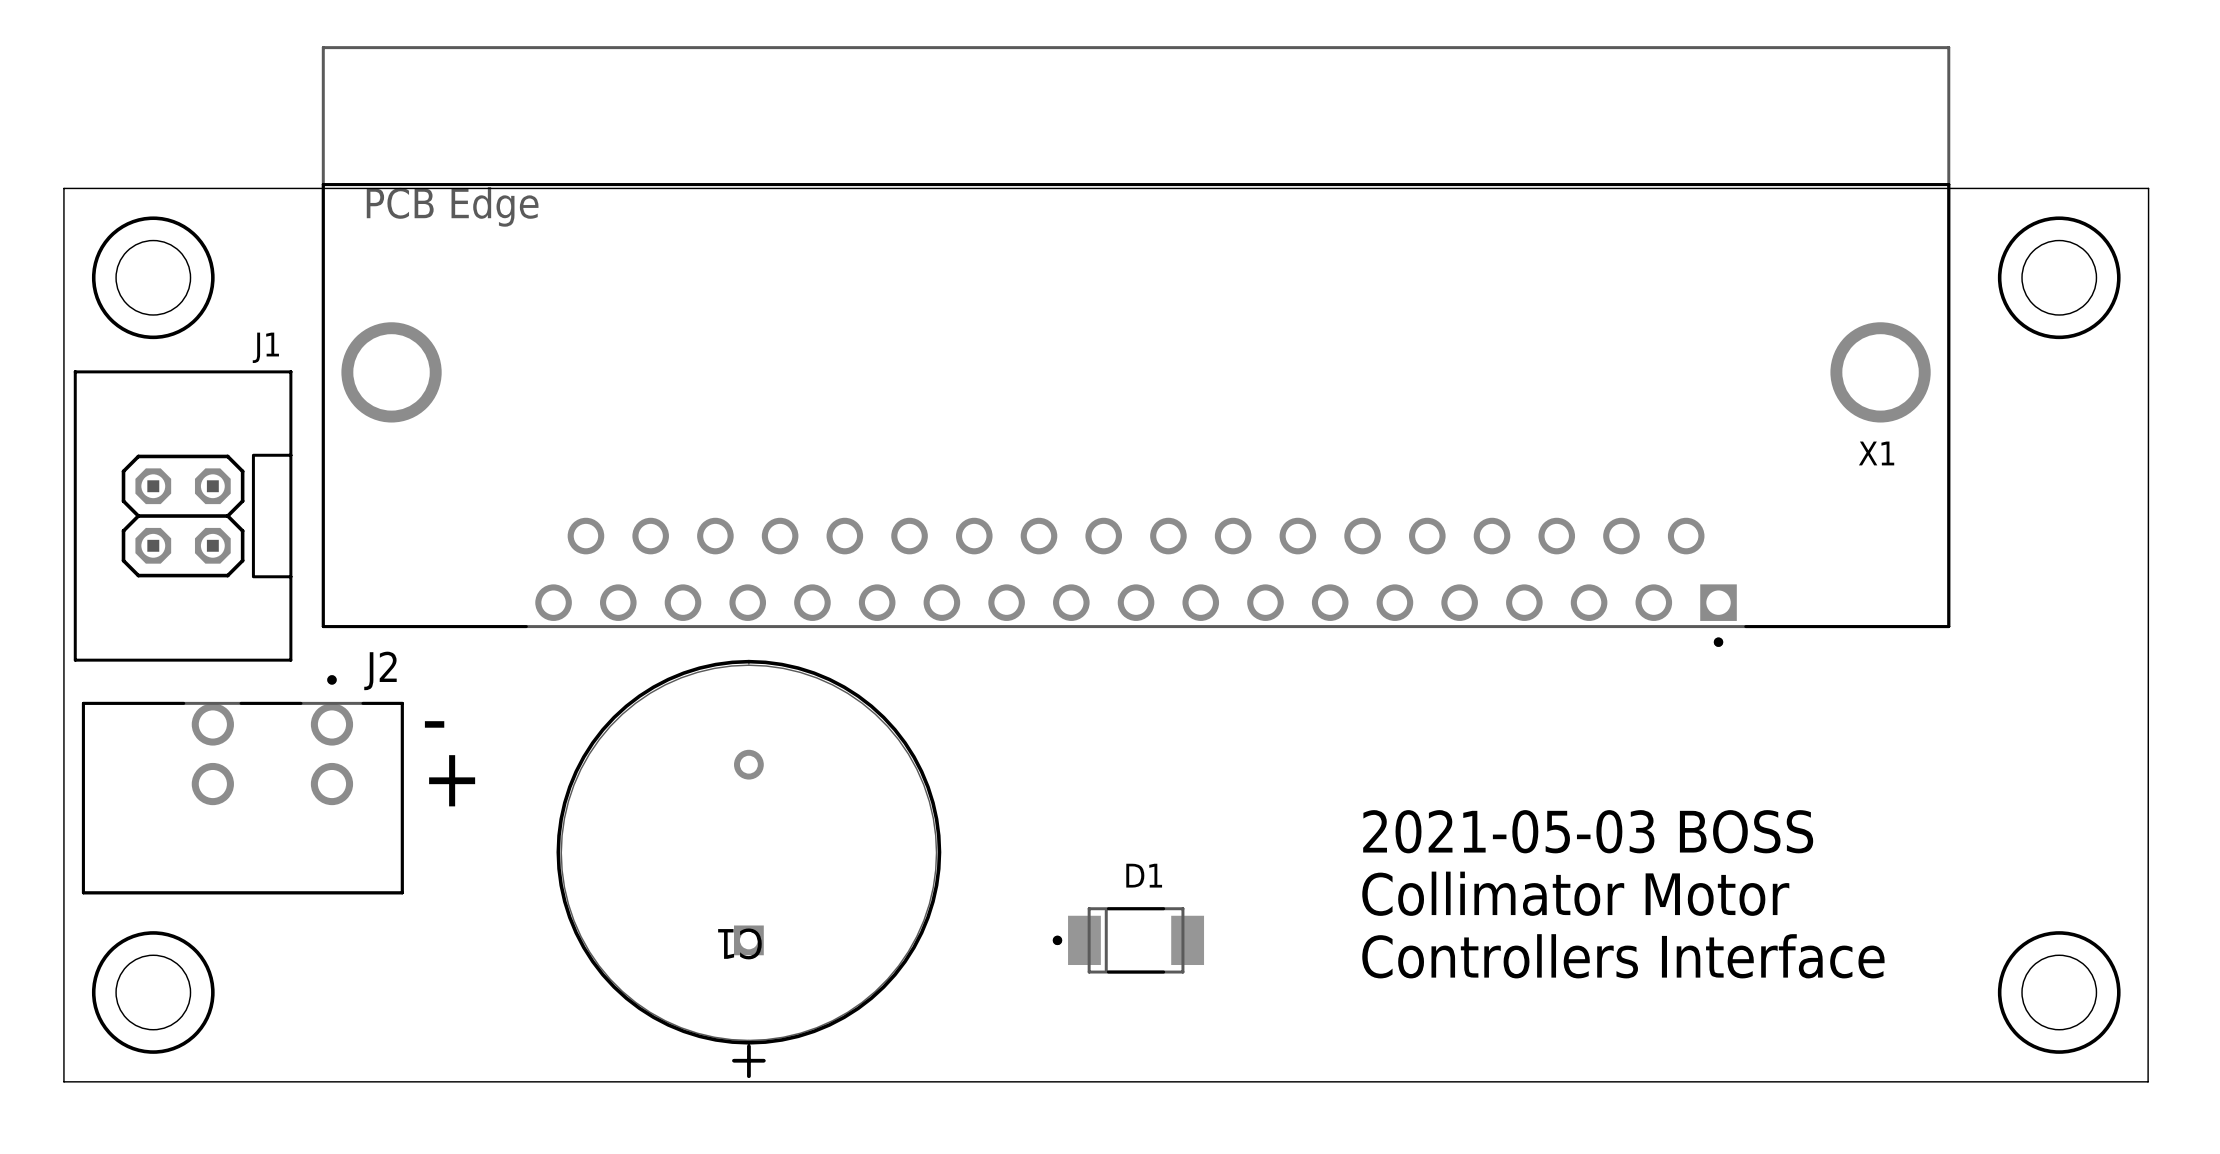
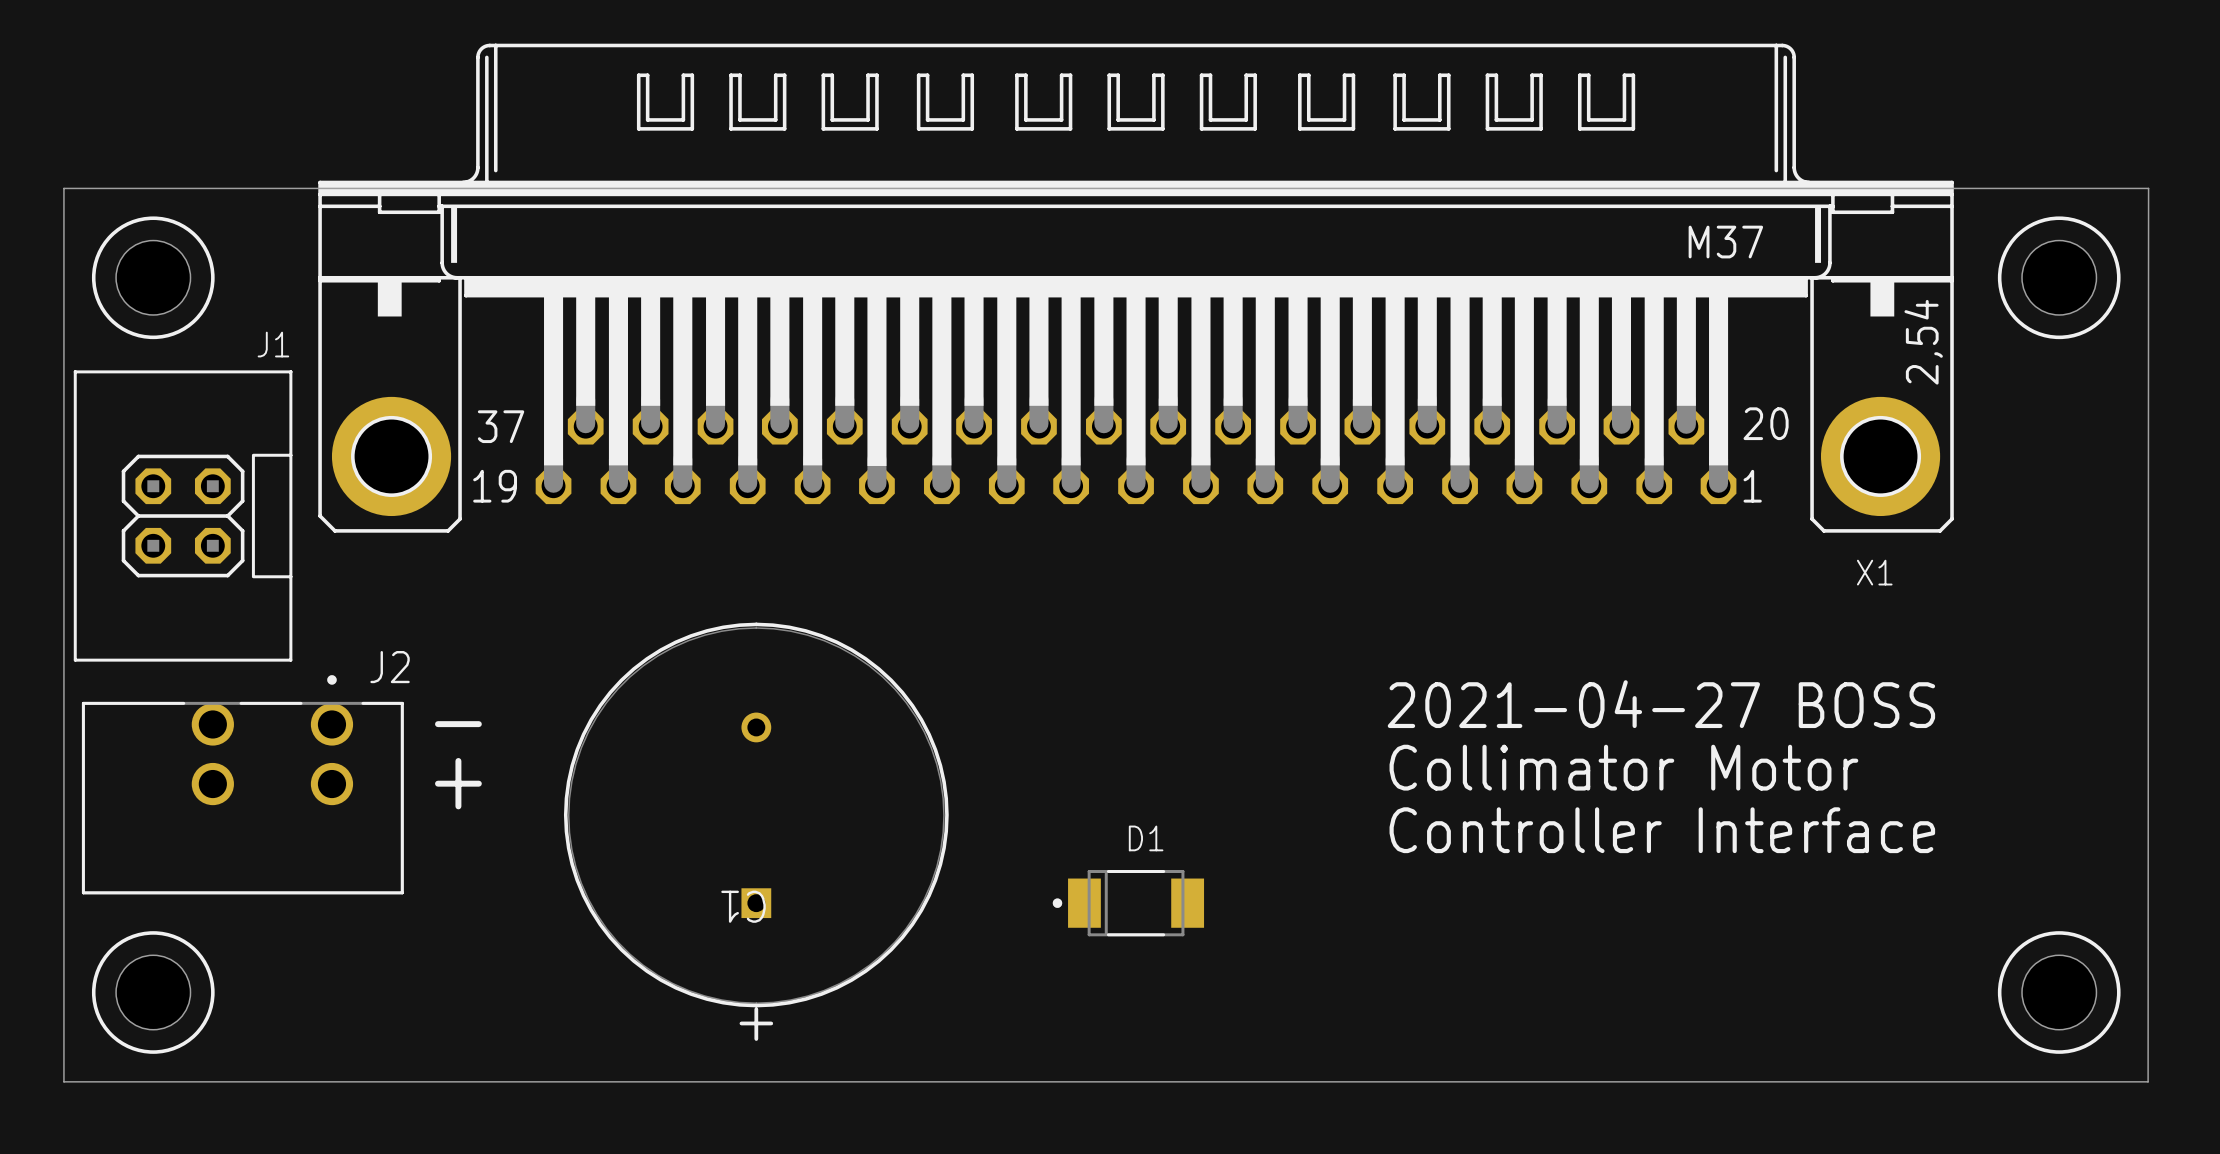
X1 footprint: [321, 46, 1951, 647] -> [318, 43, 1954, 533]
X1 name position: X1 (1876, 453) -> X1 (1874, 572)
text: none -> 2021-04-27 BOSS (1661, 704)
text: 2021-05-03 BOSS (1588, 831) -> Controller Interface (1662, 830)
C1 position: (748, 868) -> (756, 831)
text position: Collimator Motor (1575, 893) -> Collimator Motor (1623, 767)
D1 position: (1128, 940) -> (1128, 903)
text: Controllers Interface (1623, 956) -> none

